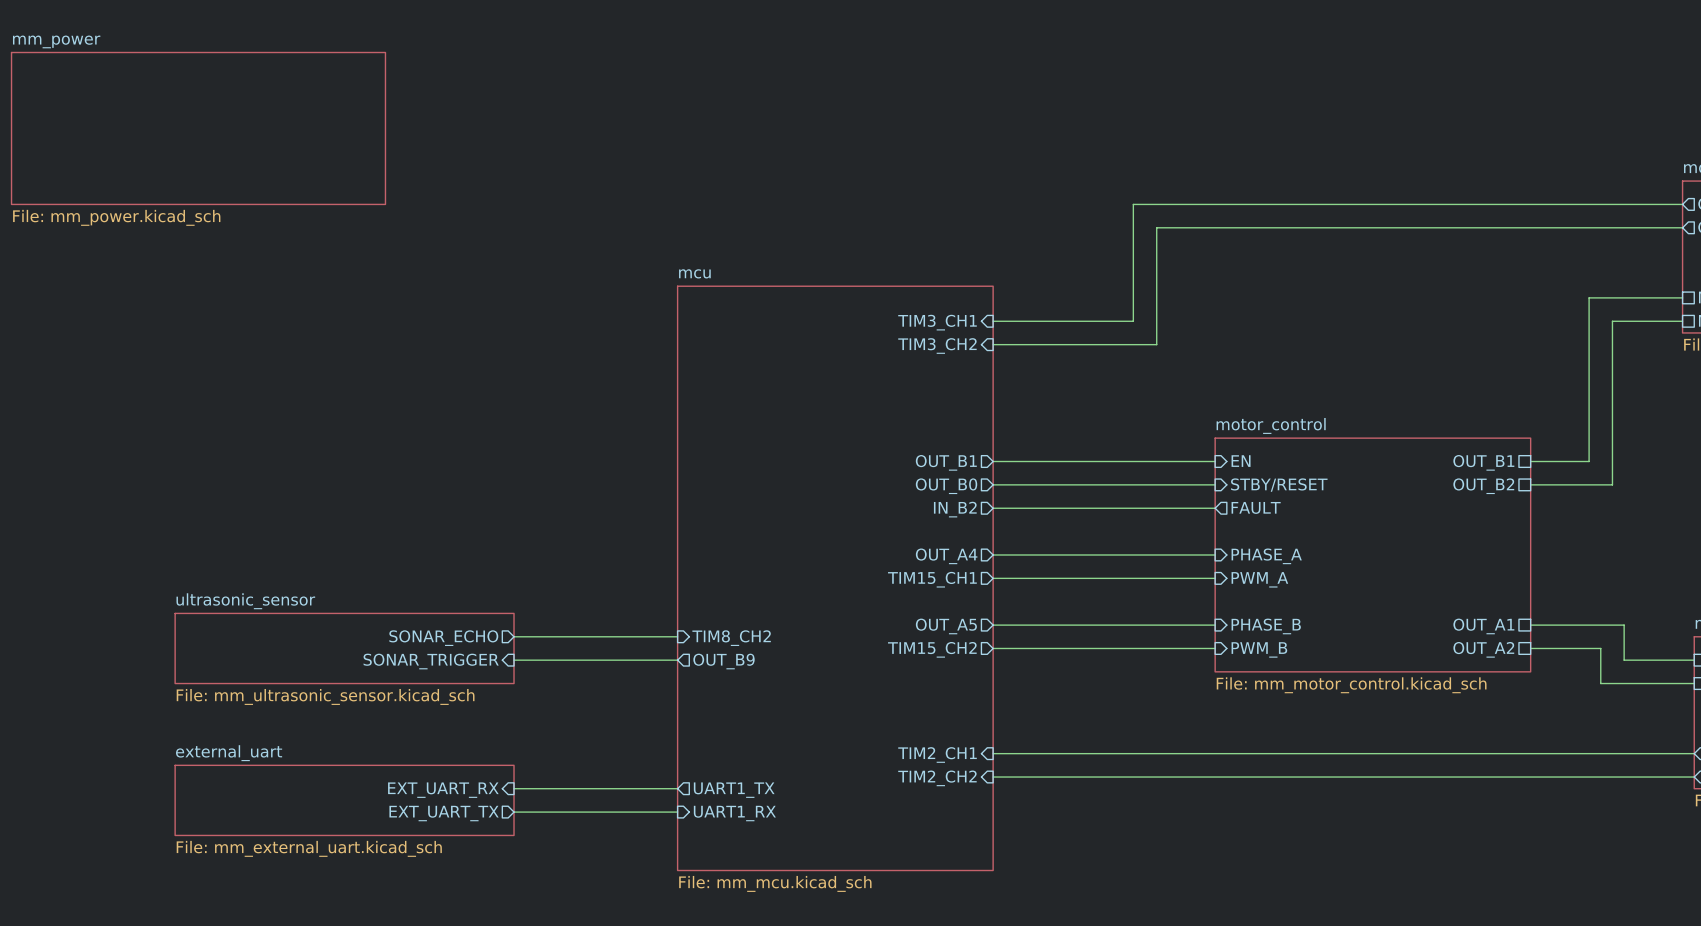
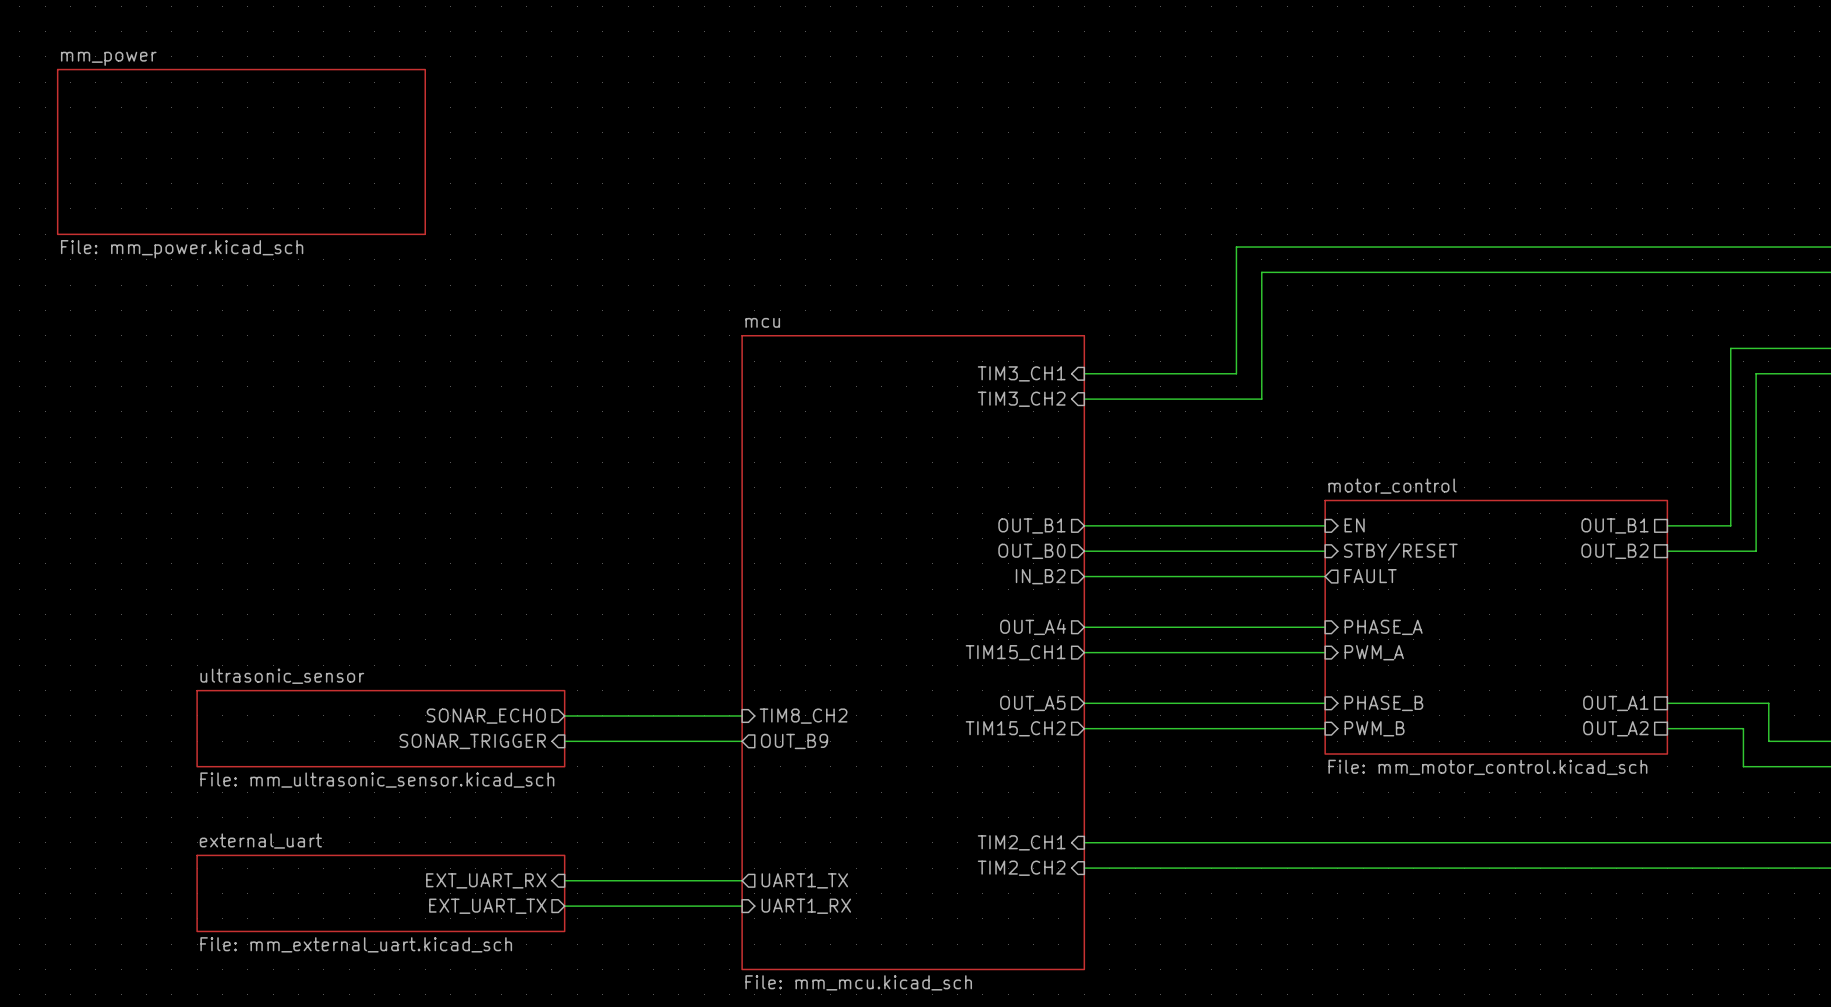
sheet mm_power: none -> File: mm_power.kicad_sch (241, 151)
sheet mm_power: File: mm_power.kicad_sch (198, 128) -> none

